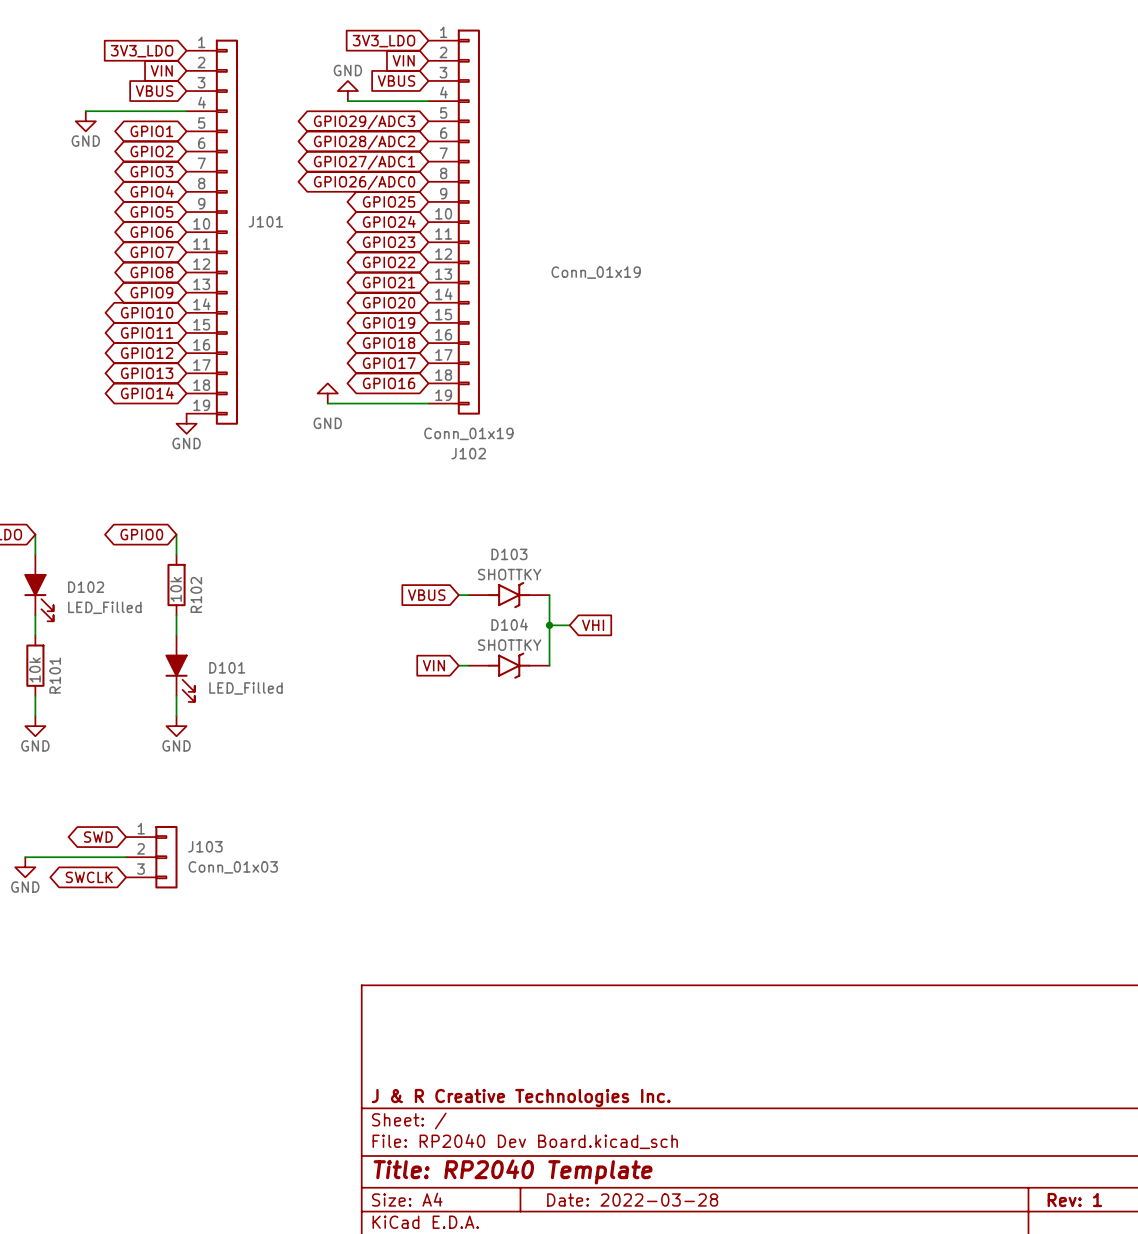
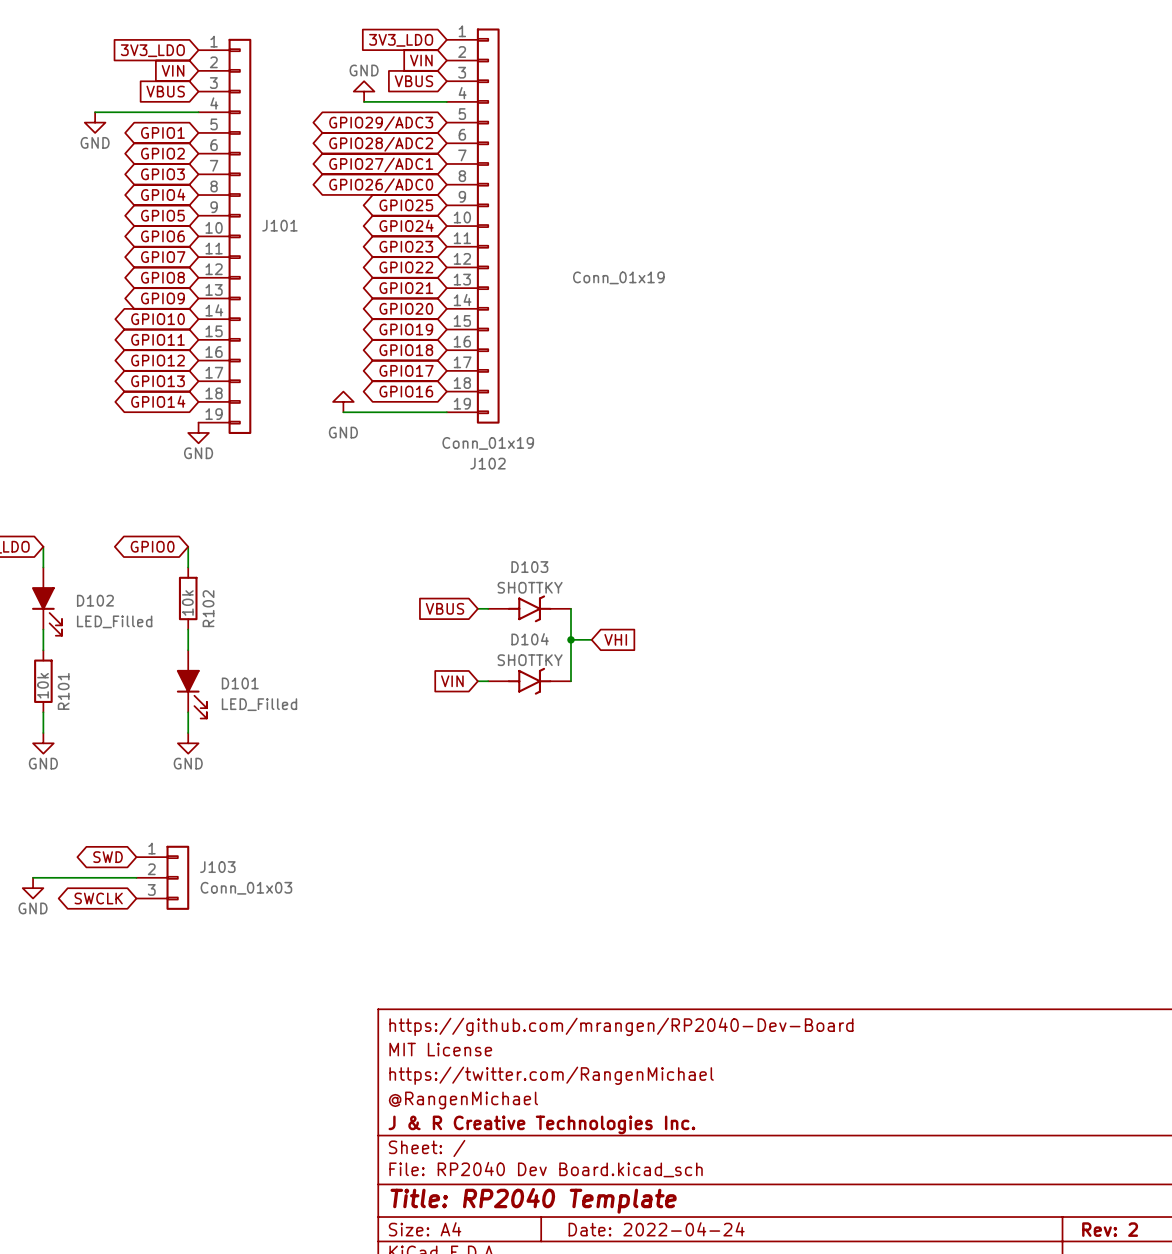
title block: none -> https://github.com/mrangen/RP2040-Dev-Board (621, 1026)
title block: none -> MIT License (440, 1049)
title block: none -> https://twitter.com/RangenMichael (551, 1075)
title block: none -> @RangenMichael (463, 1100)
title block: Date: 2022-03-28 (632, 1200) -> Date: 2022-04-24 (656, 1229)
title block: Rev: 1 (1074, 1200) -> Rev: 2 (1110, 1229)

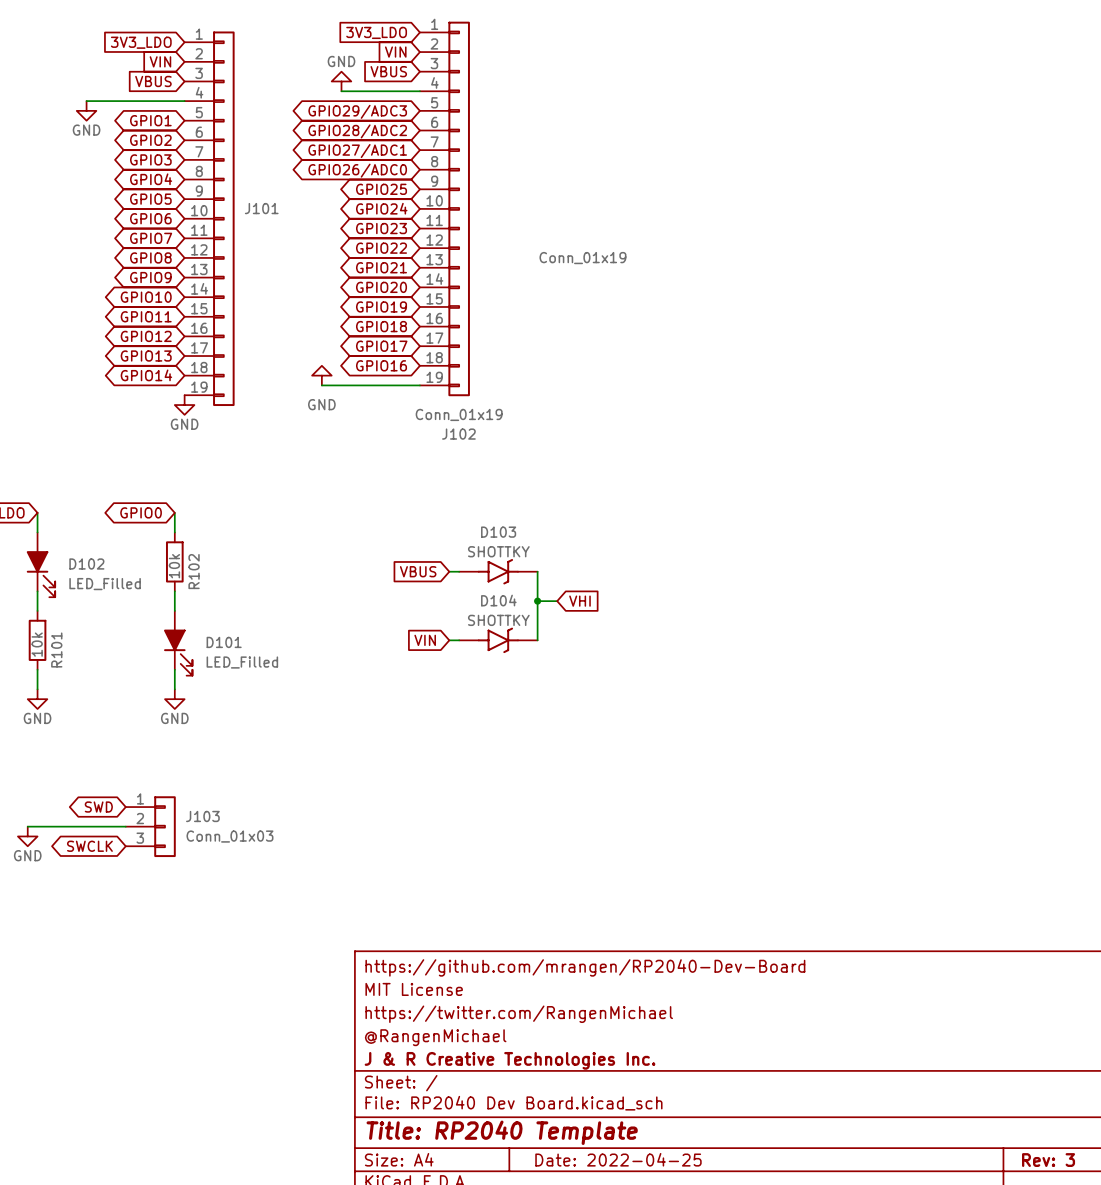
title block: Date: 2022-04-24 (656, 1229) -> Date: 2022-04-25 (618, 1159)
title block: Rev: 2 (1110, 1229) -> Rev: 3 (1048, 1160)

